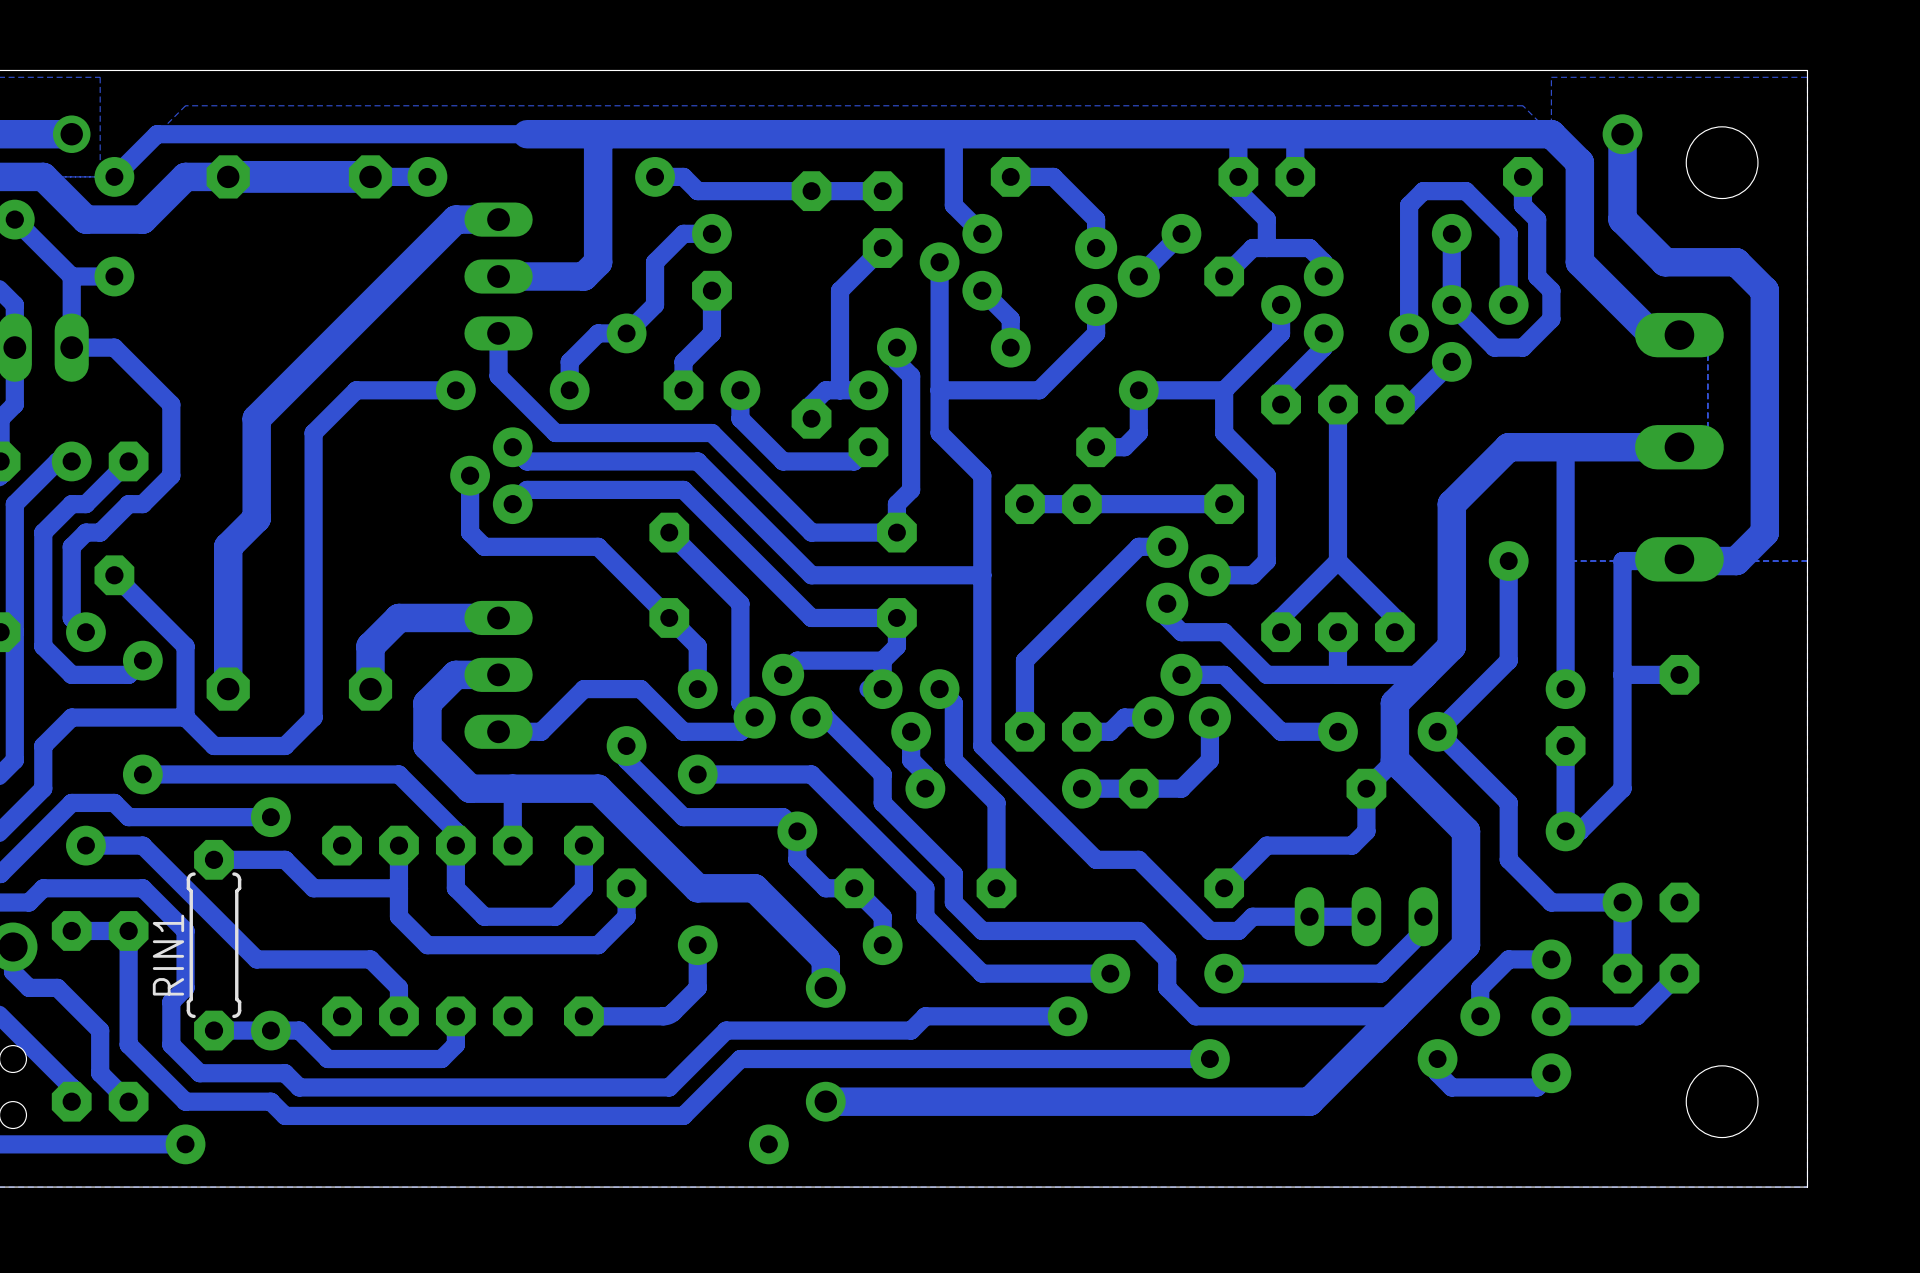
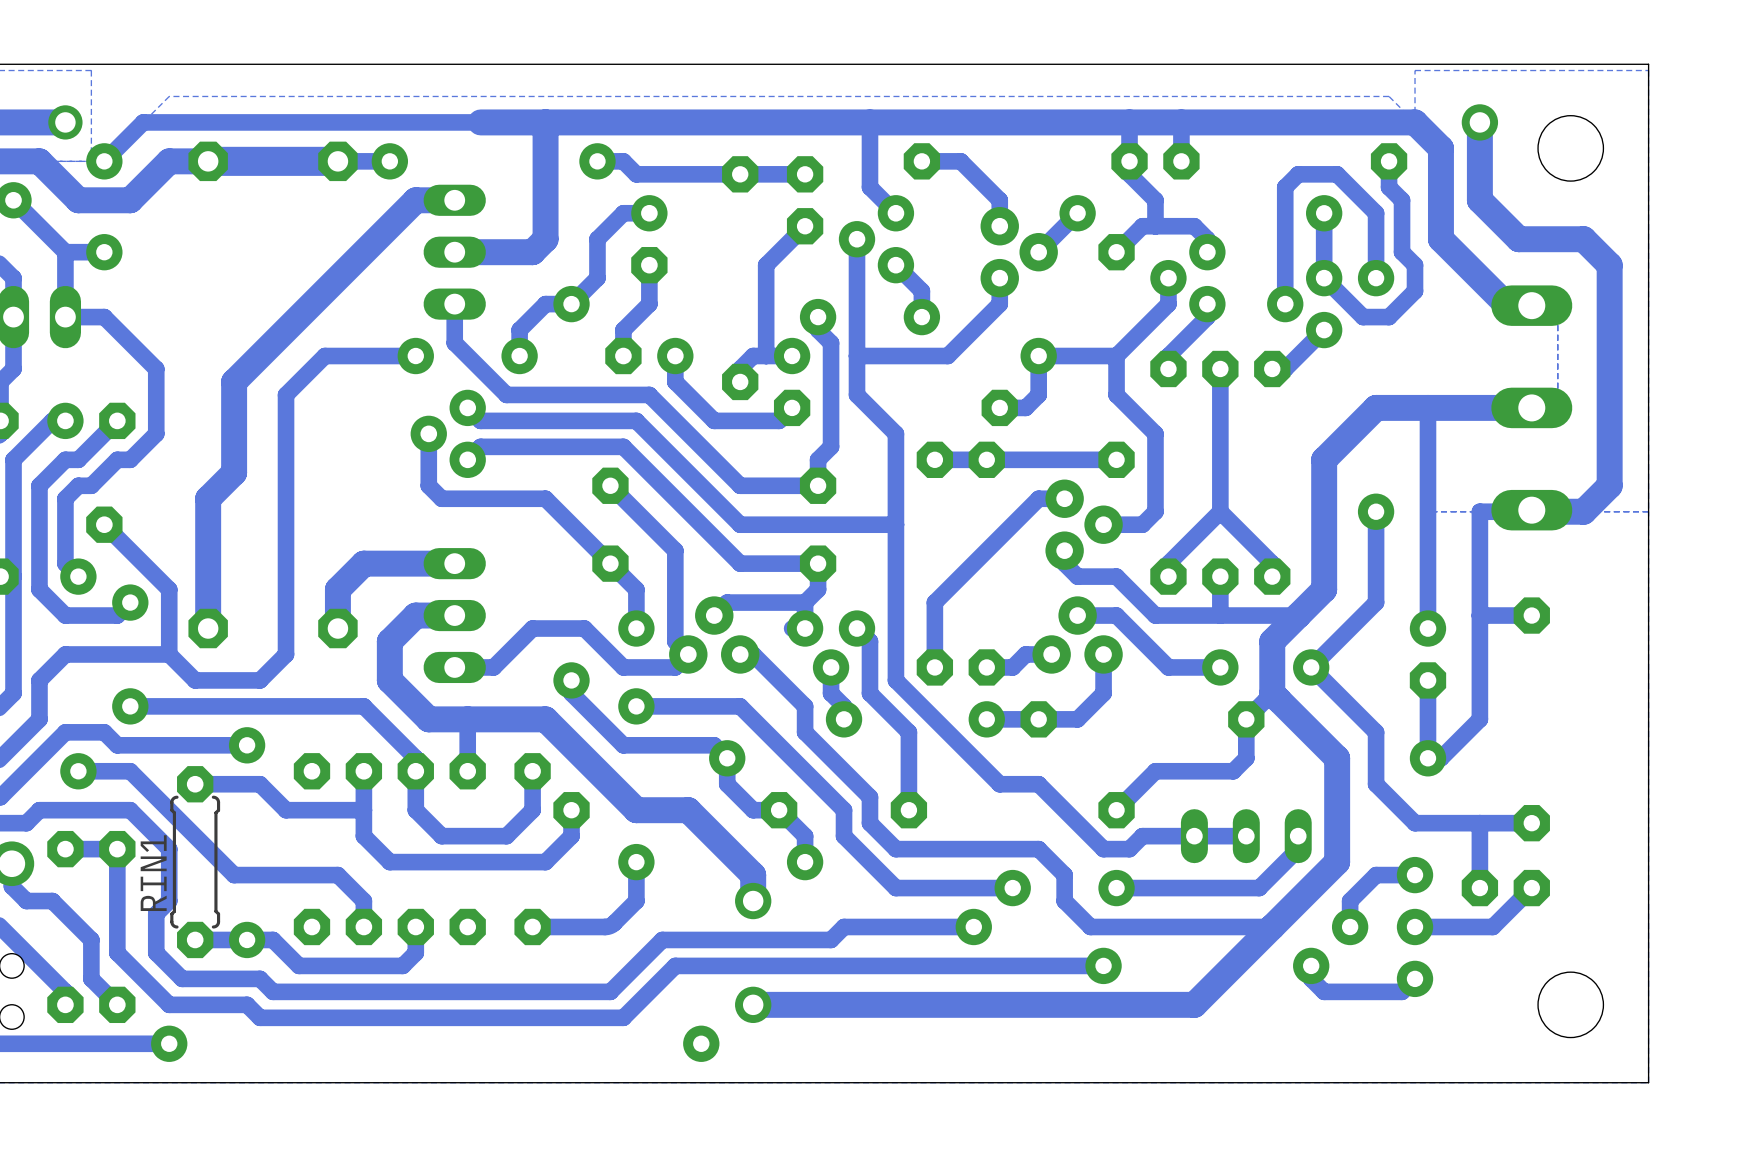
via: (1622, 902) -> none
track: none -> (1531, 823) (1479, 823)

